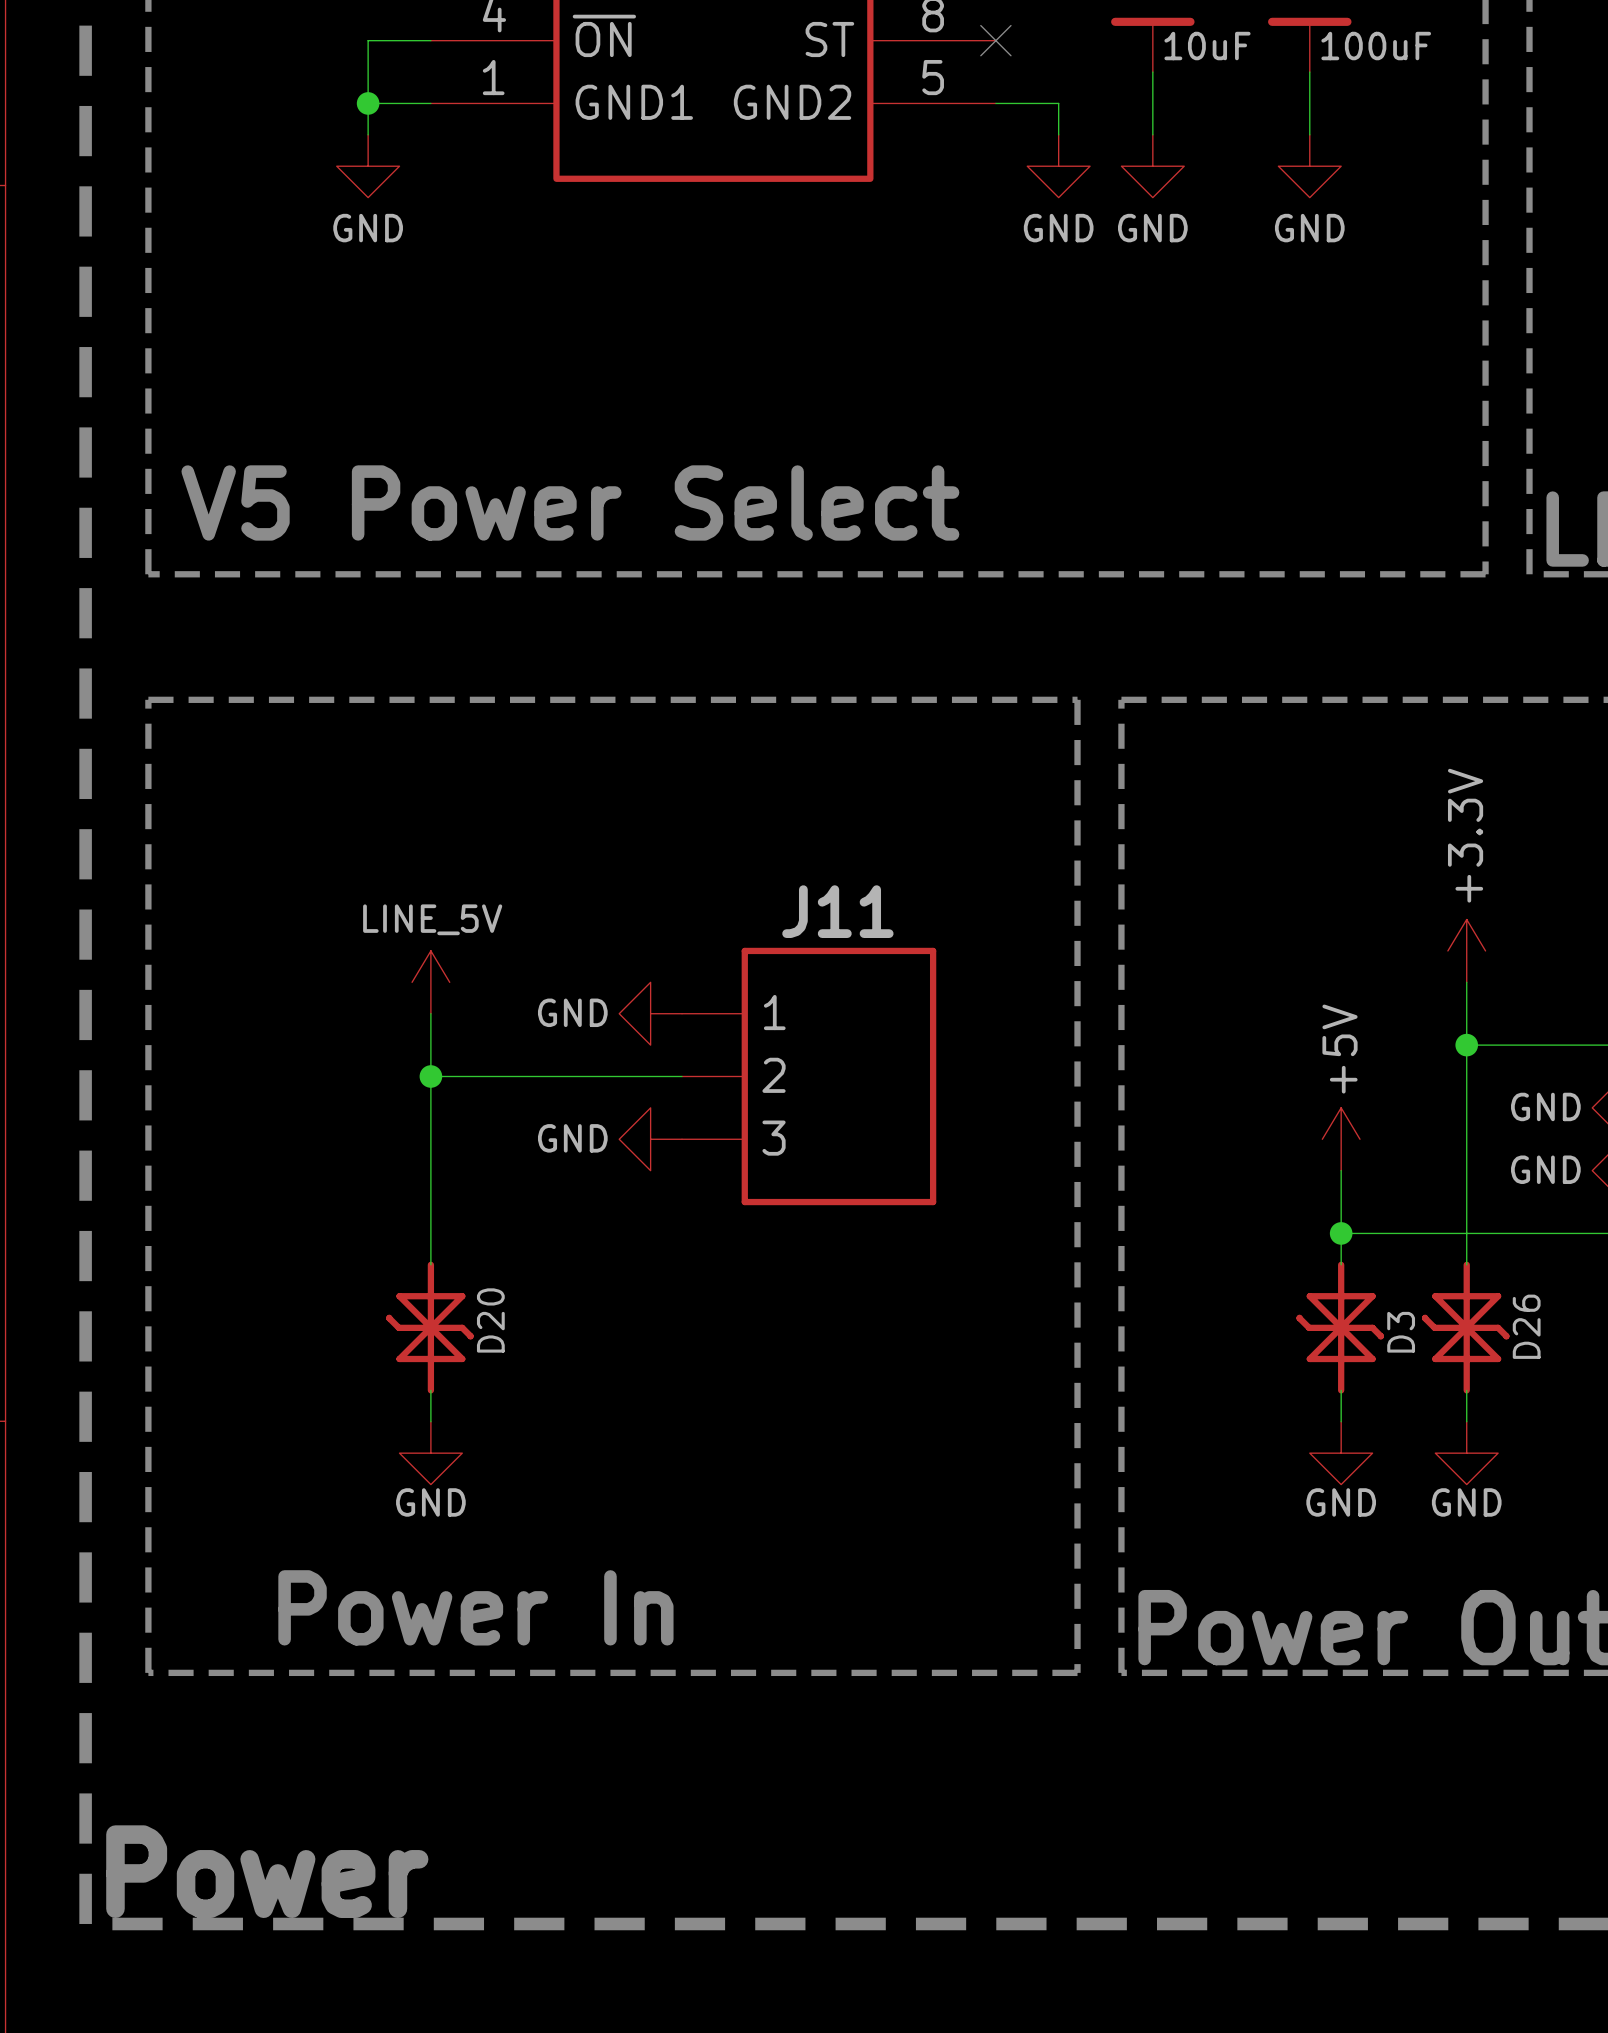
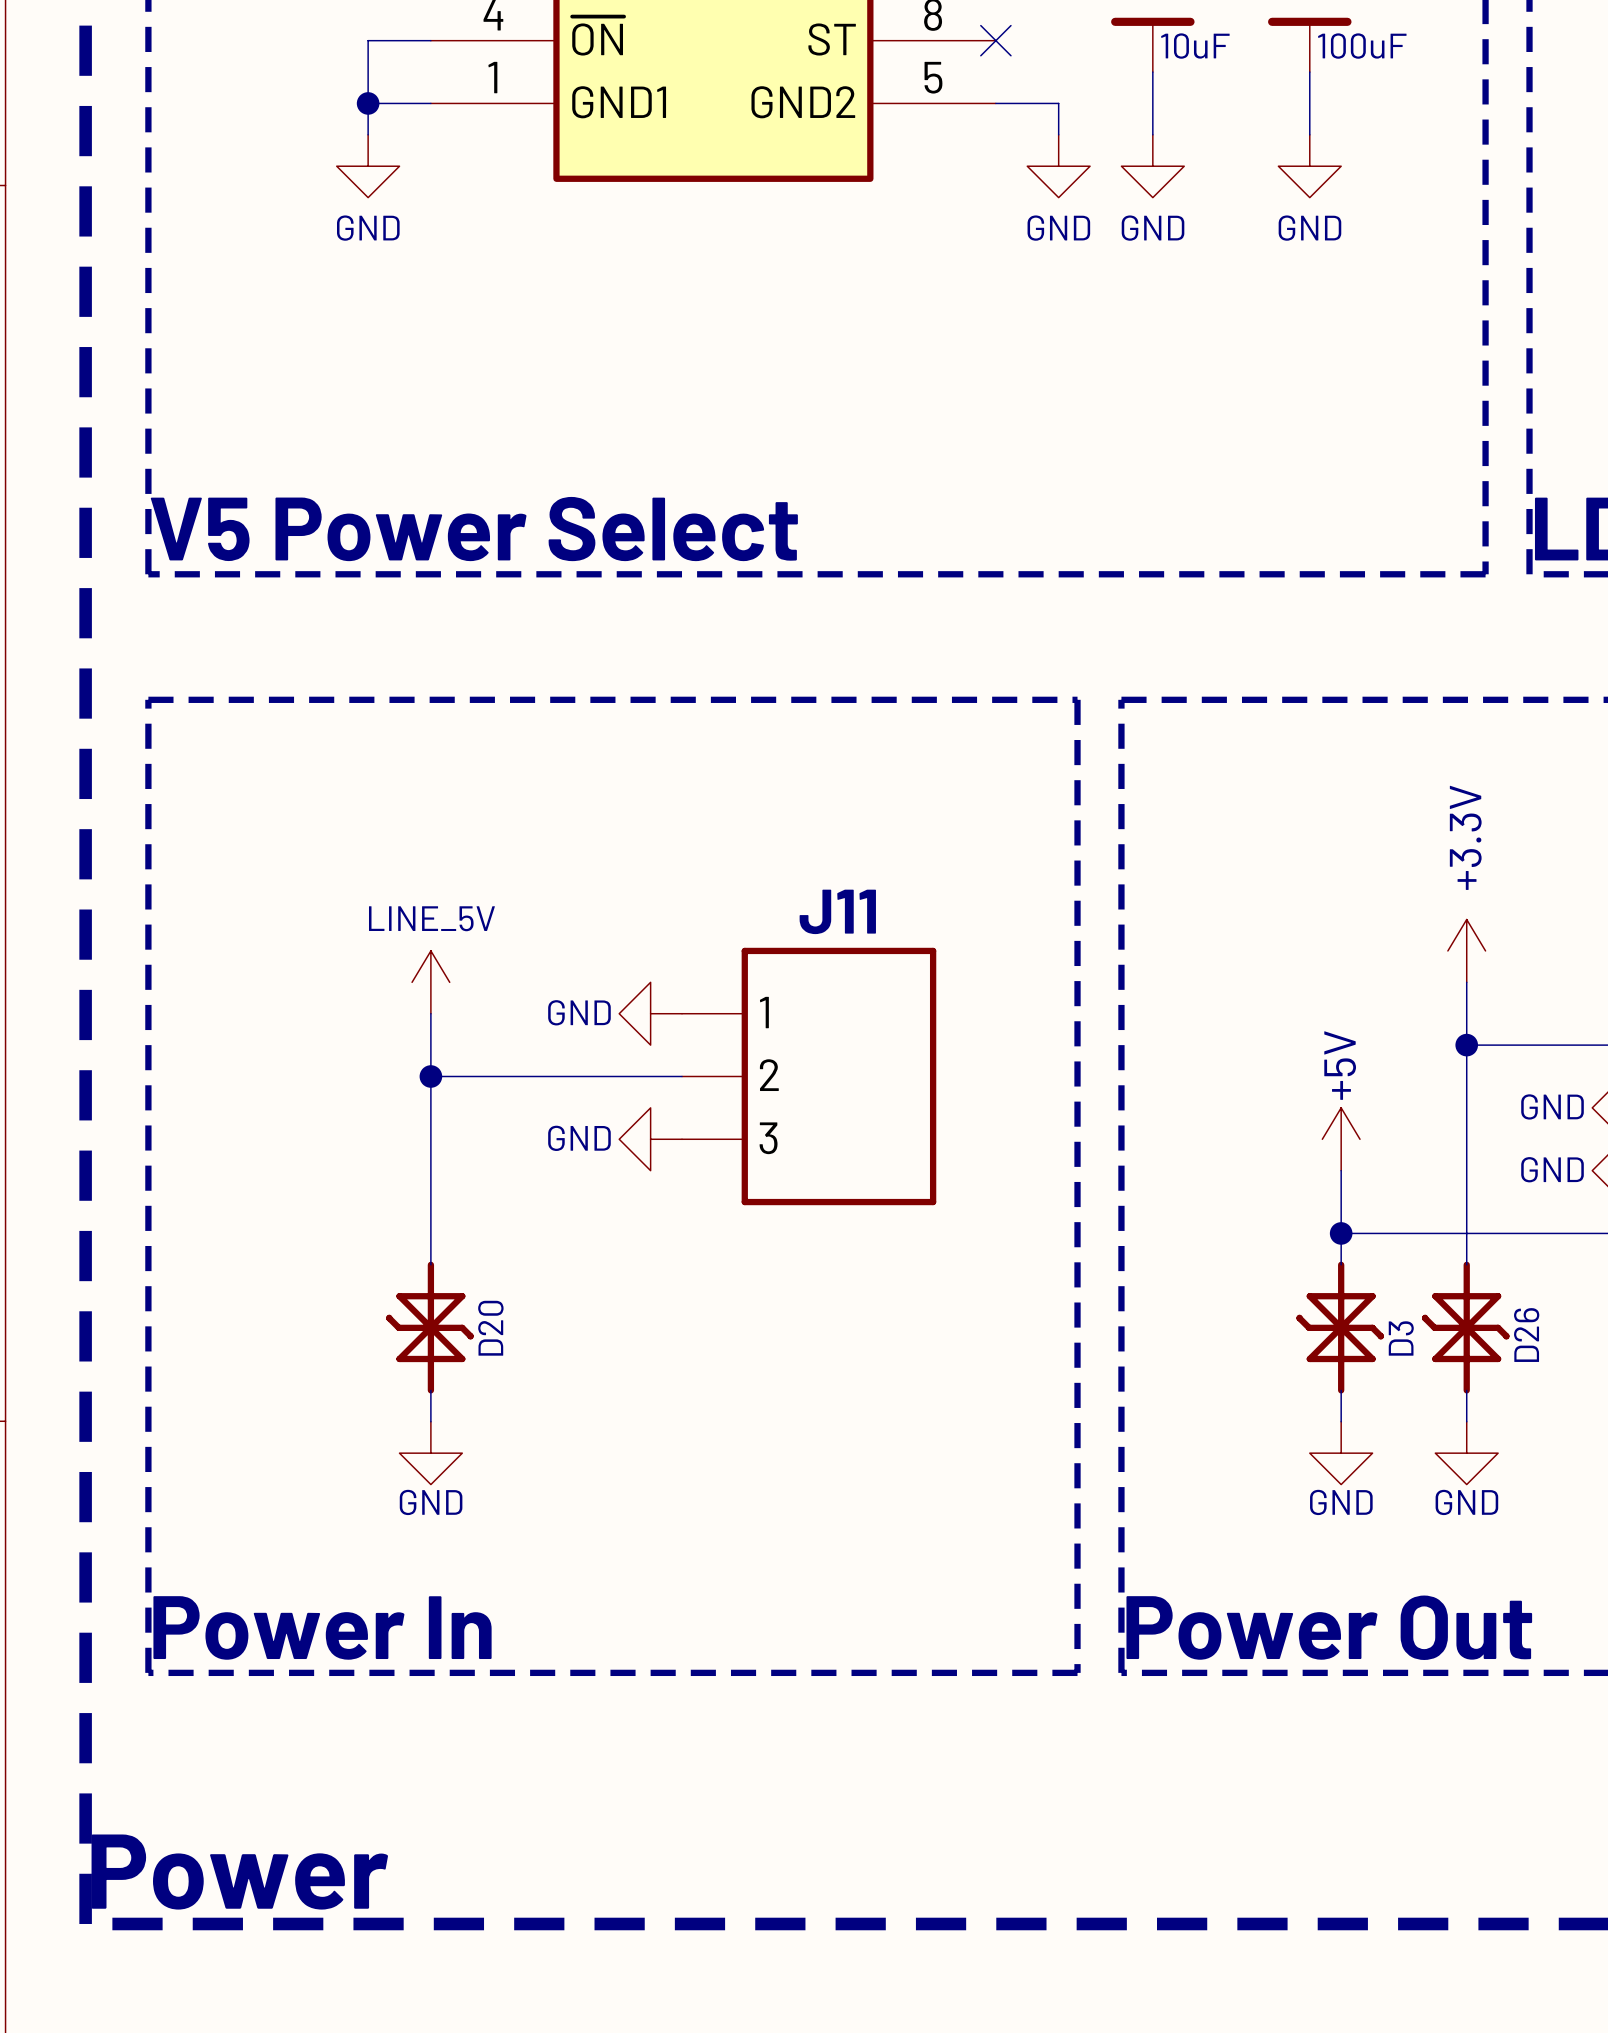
text position: V5 Power Select (570, 502) -> V5 Power Select (474, 529)
text position: Power In (475, 1607) -> Power In (322, 1627)

